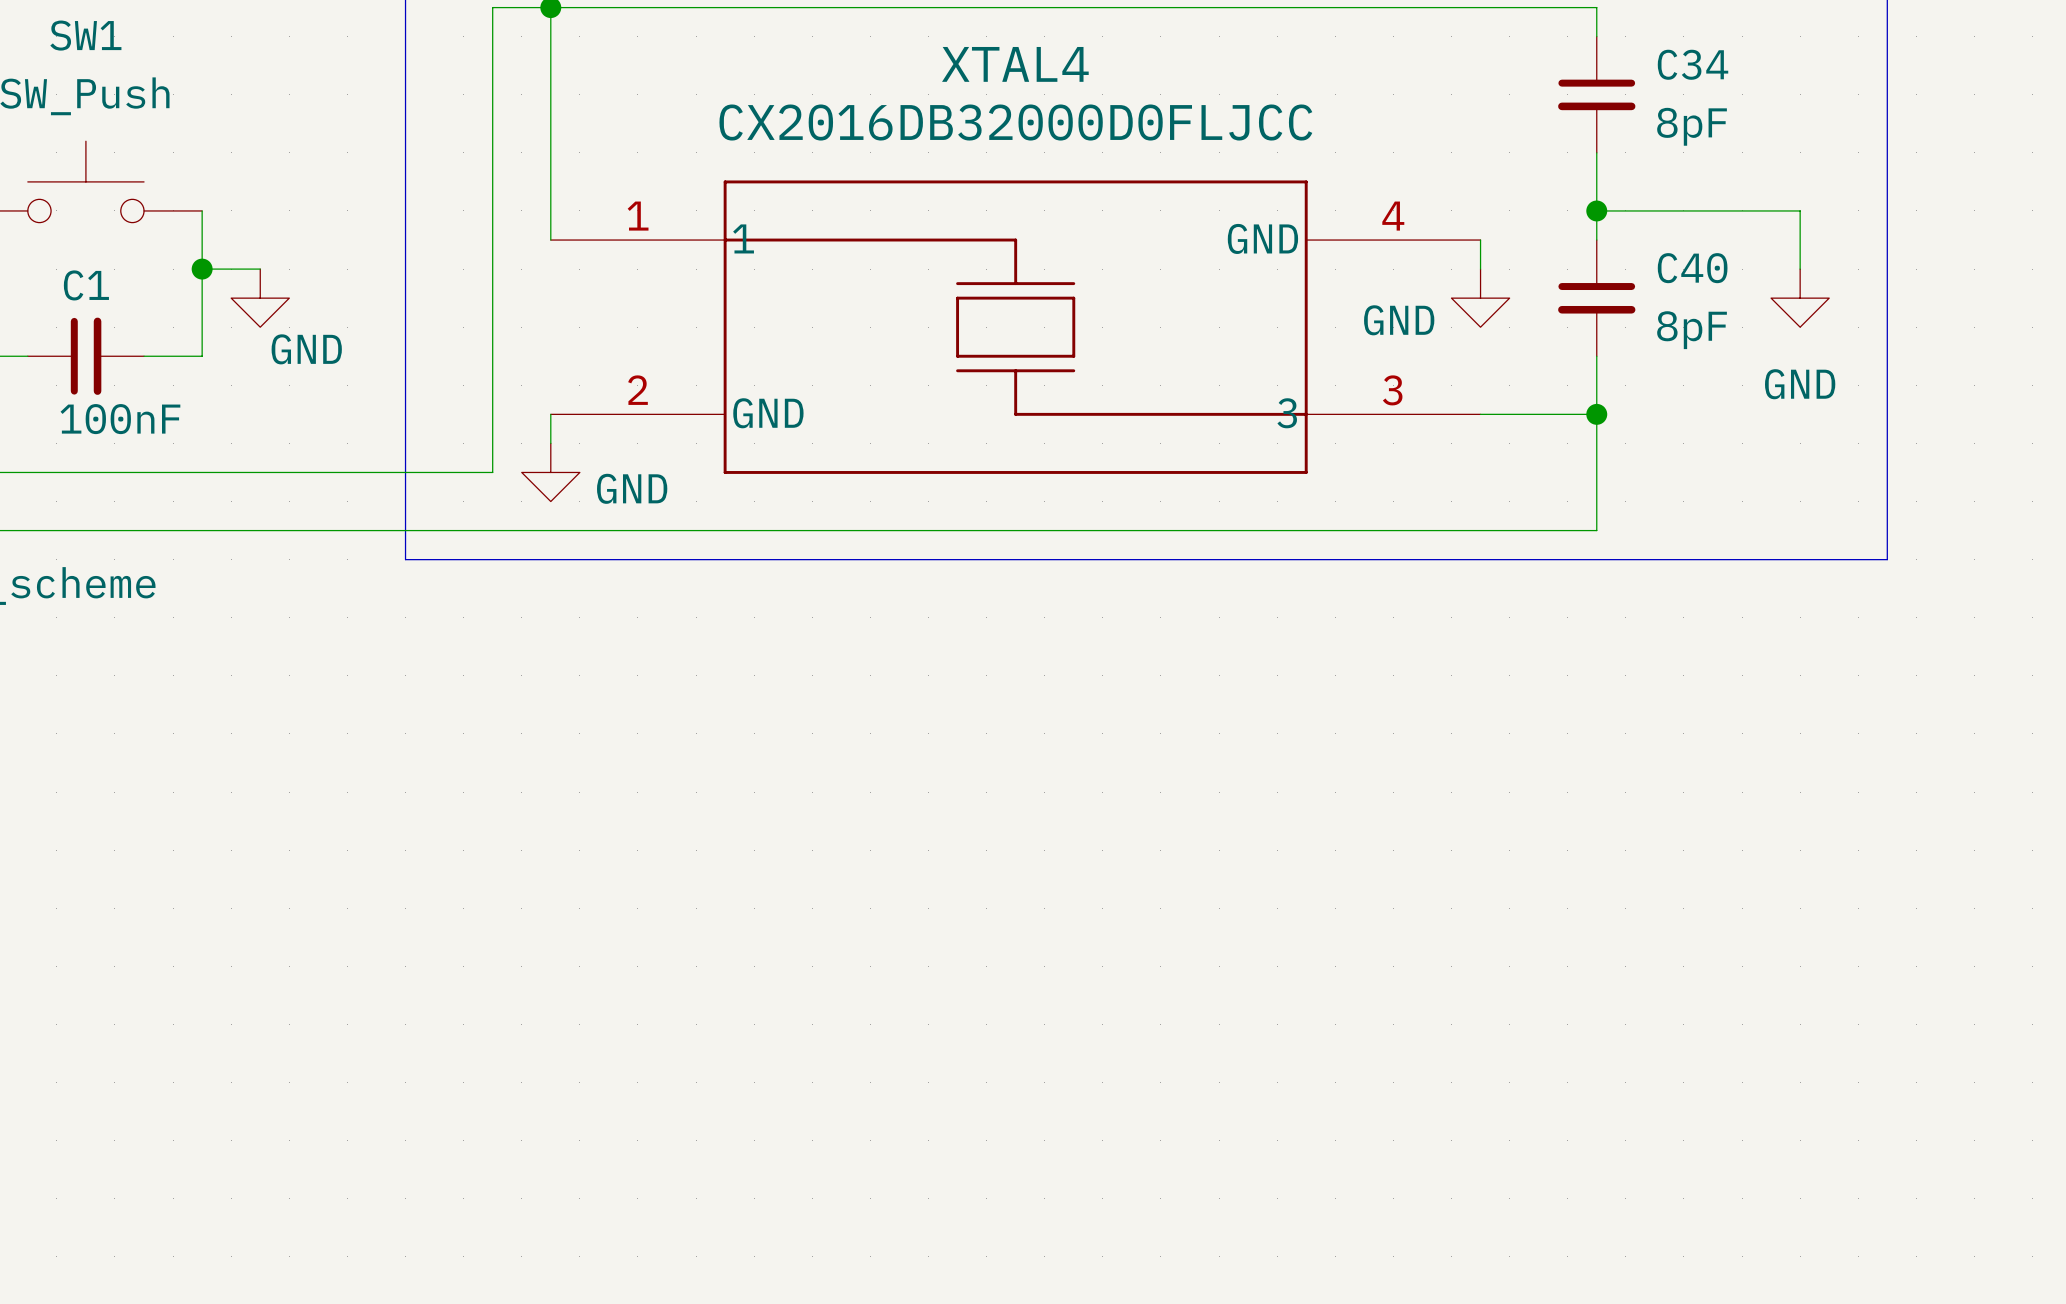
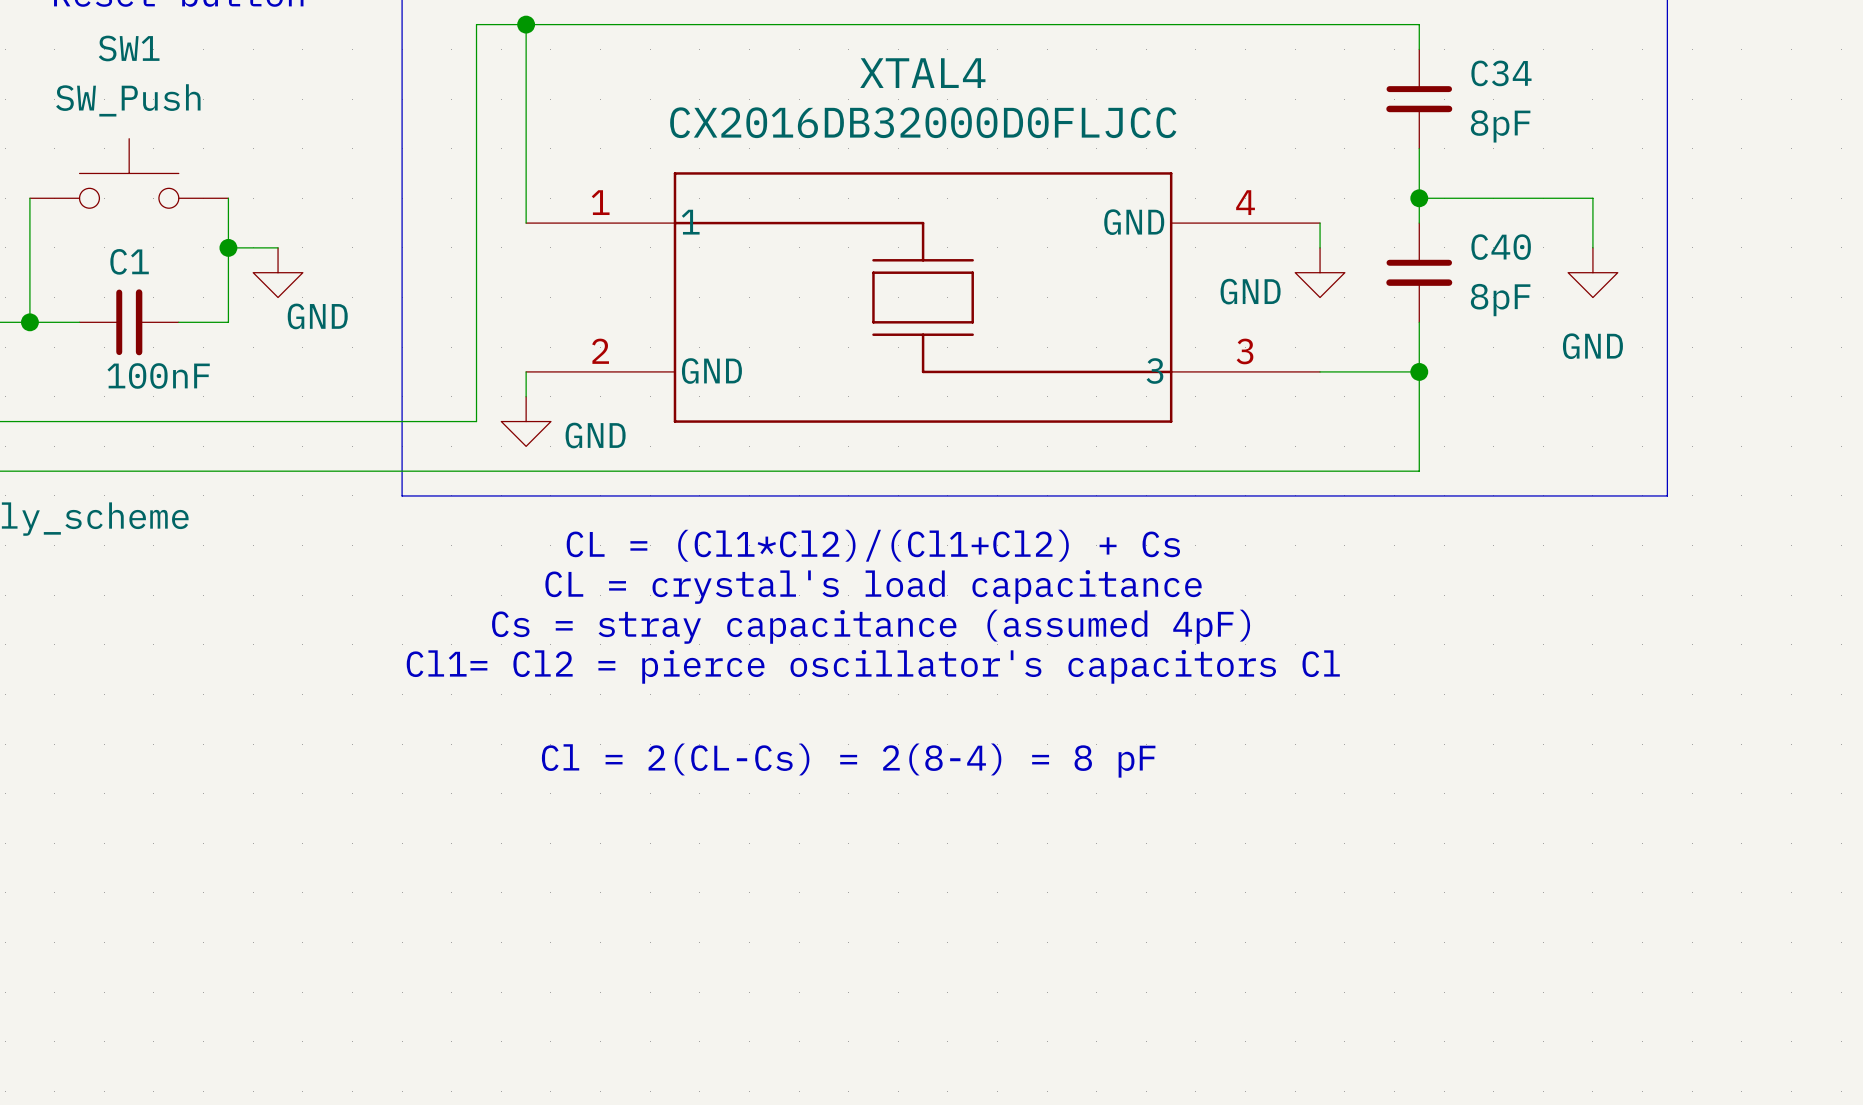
text: none -> CL = (Cl1*Cl2)/(Cl1+Cl2) + Cs (873, 545)
text: none -> CL = crystal's load capacitance (873, 586)
text: none -> Cs = stray capacitance (assumed 4pF) (871, 626)
text: none -> Cl1= Cl2 = pierce oscillator's capacitors Cl (873, 666)
text: none -> Cl = 2(CL-Cs) = 2(8-4) = 8 pF (848, 760)

